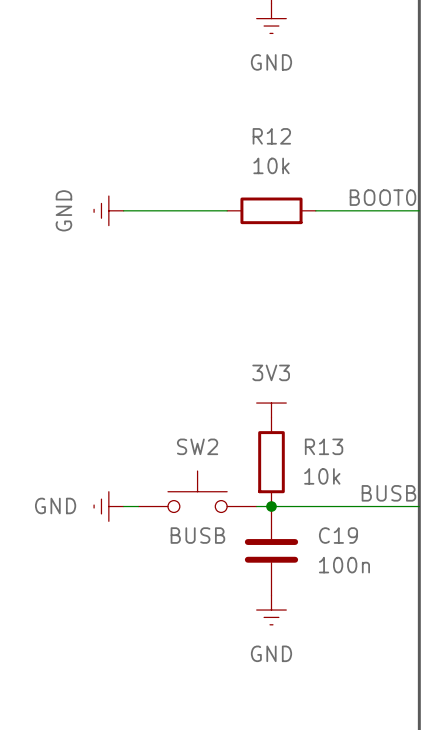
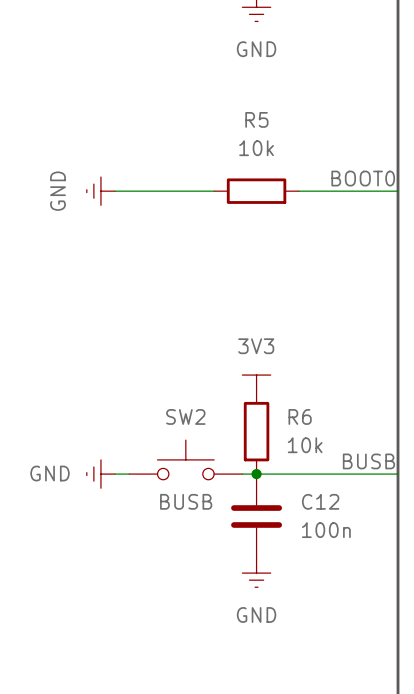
R12 name: R12 (271, 136) -> R5 (256, 119)
R13 name: R13 (324, 446) -> R6 (300, 416)
C19 name: C19 (338, 535) -> C12 (320, 501)

